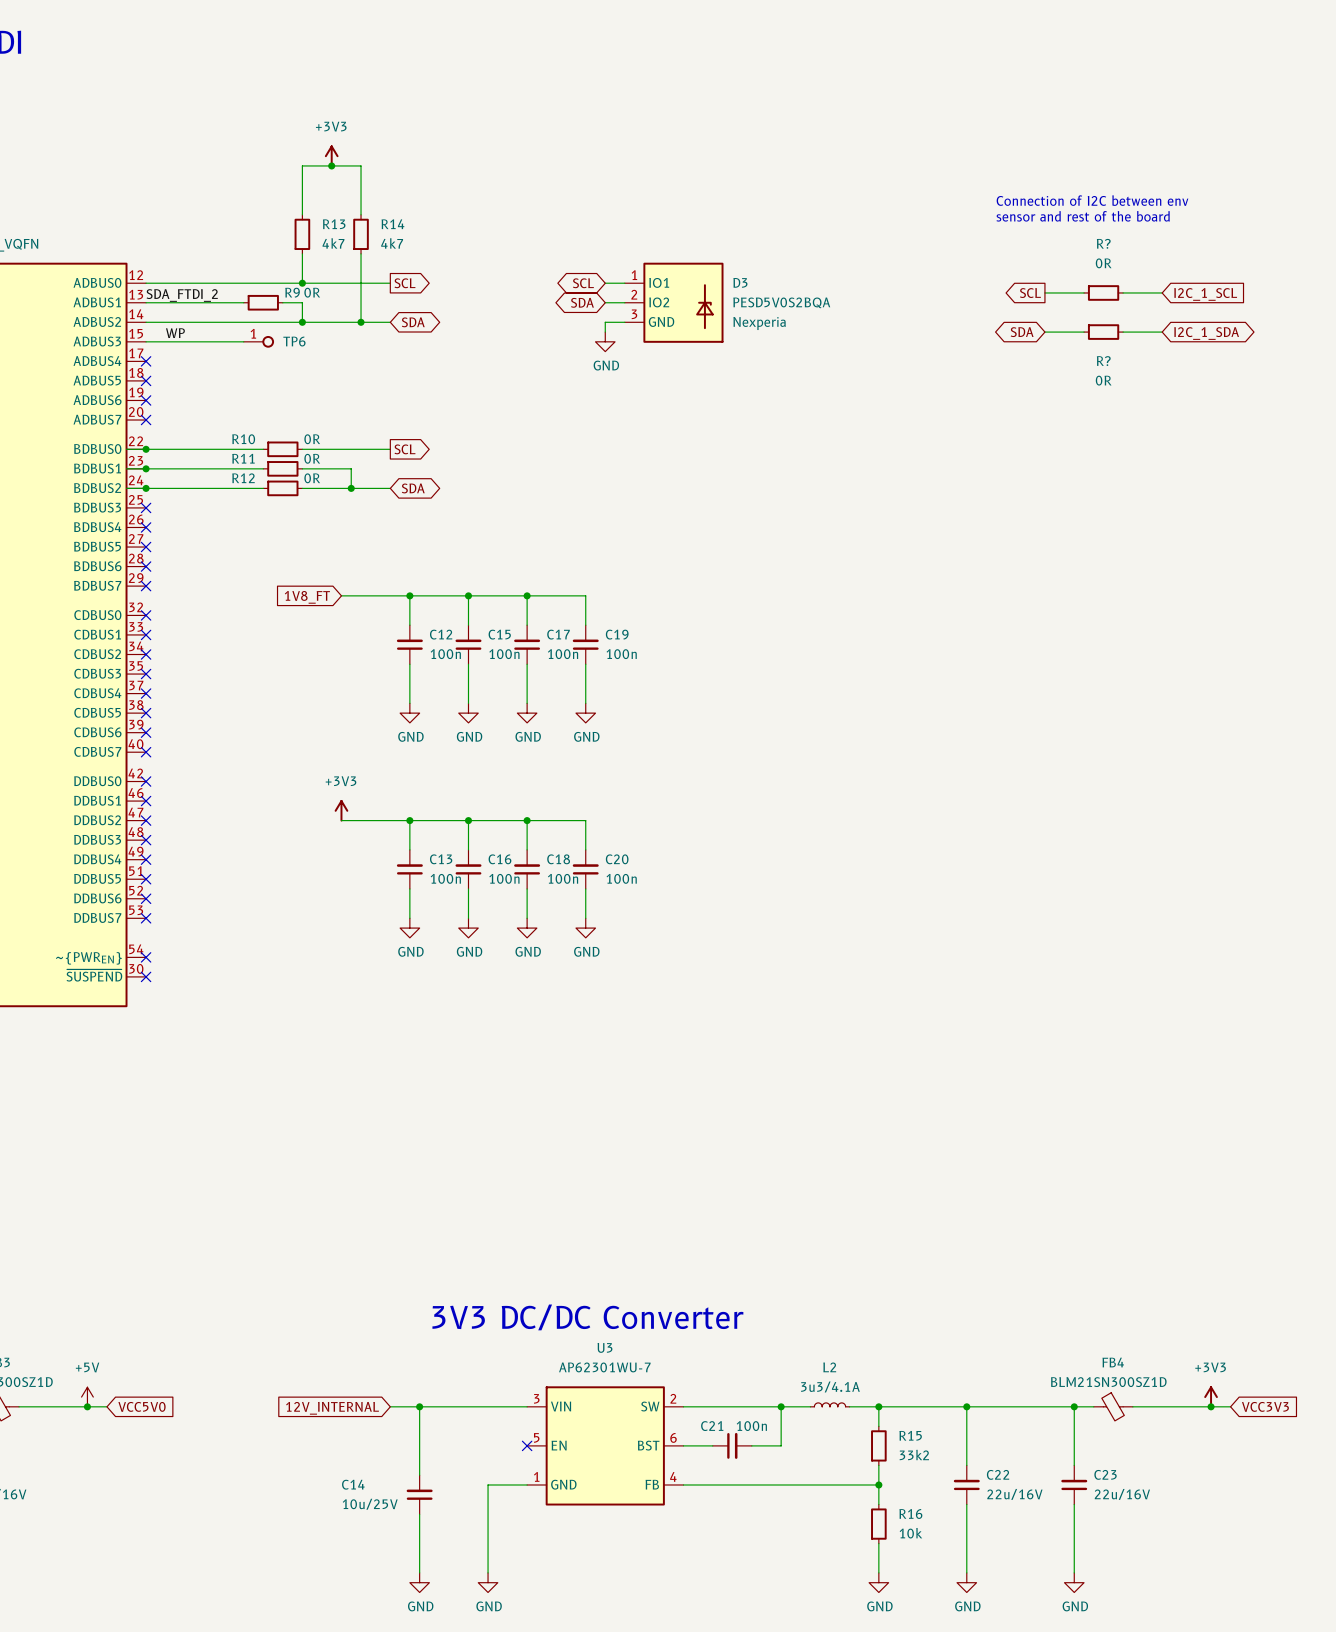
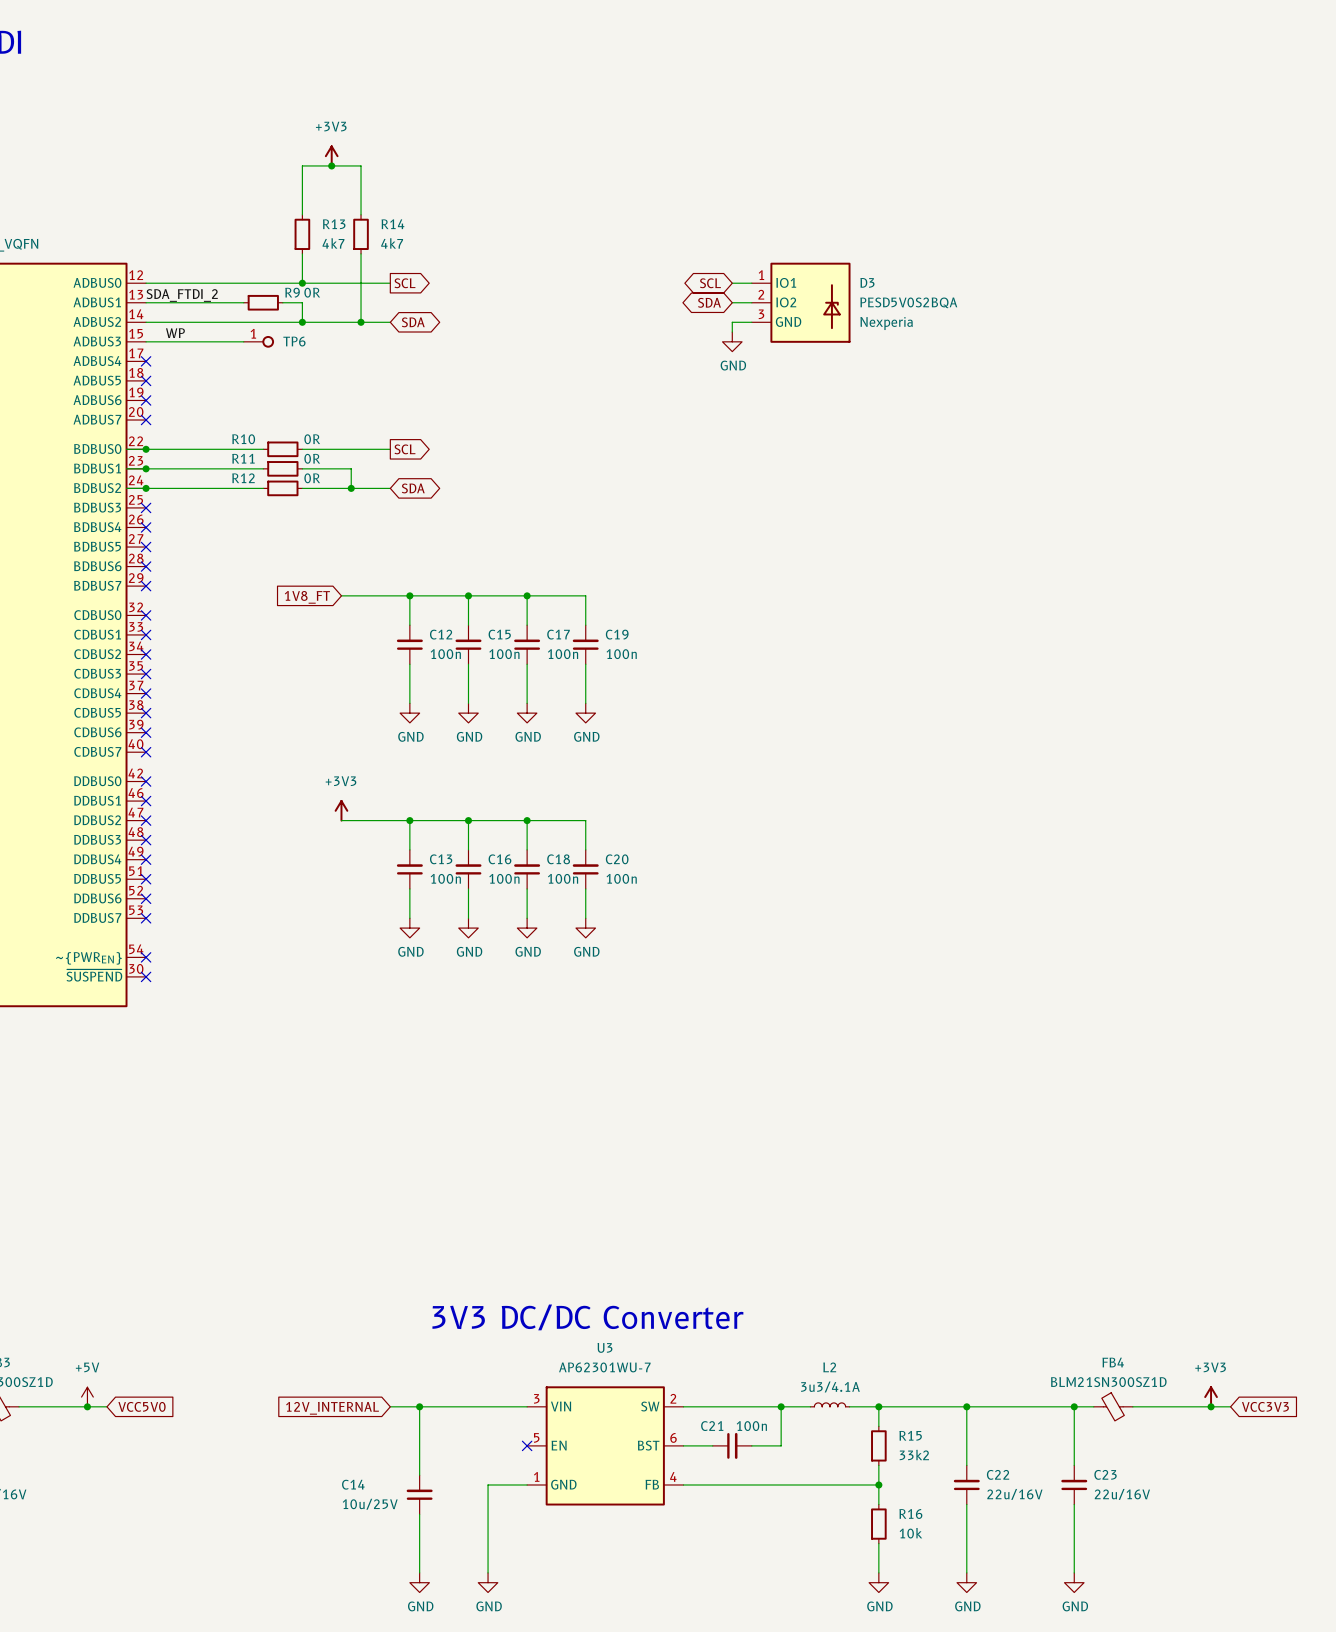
text: Connection of I2C between env (1092, 200) -> none
text: sensor and rest of the board (1083, 216) -> none
global label position: SCL (583, 283) -> SCL (710, 283)
wire: (605, 283) (624, 283) -> (732, 283) (751, 283)
wire: (1044, 292) (1084, 292) -> none
R?: (1103, 292) -> none
wire: (1123, 292) (1162, 292) -> none
global label: SCL (1030, 293) -> none
global label: I2C_1_SCL (1205, 294) -> none
global label position: SDA (582, 302) -> SDA (709, 302)
wire: (605, 302) (624, 302) -> (732, 302) (751, 302)
D3 position: (674, 302) -> (801, 302)
wire: (624, 322) (605, 322) (605, 332) -> (751, 322) (732, 322) (732, 332)
global label: SDA (1022, 332) -> none
wire: (1044, 332) (1084, 332) -> none
R?: (1103, 332) -> none
wire: (1123, 332) (1162, 332) -> none
global label: I2C_1_SDA (1206, 333) -> none
power symbol position: GND (605, 341) -> GND (732, 341)

